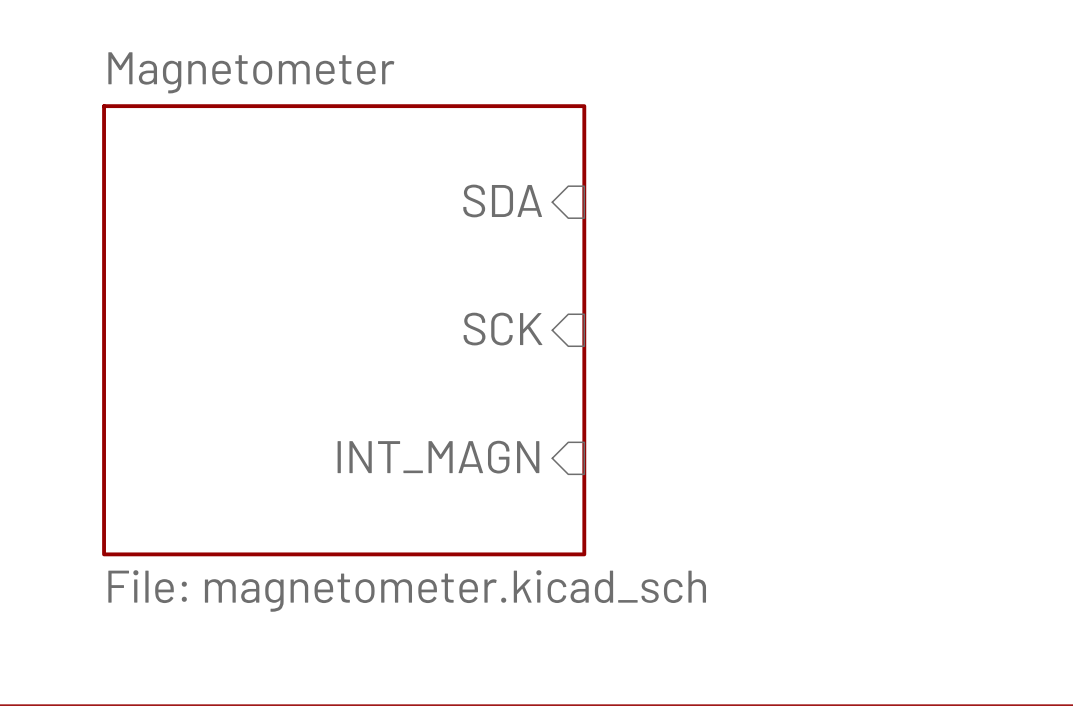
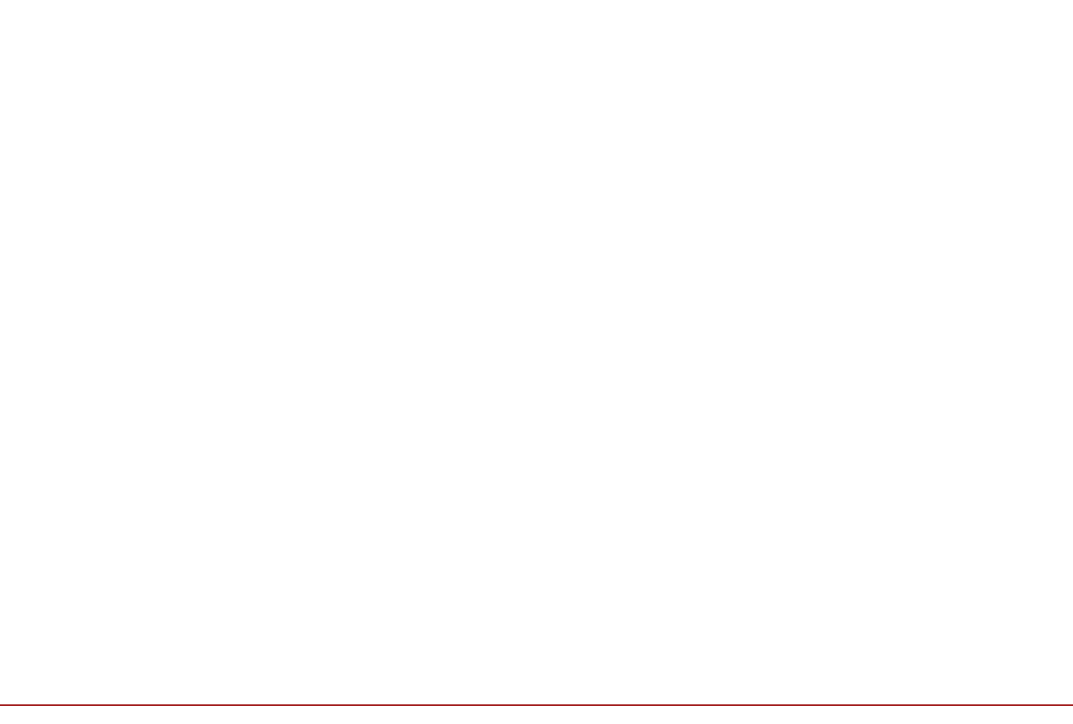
sheet pin: SDA (502, 200) -> none
sheet pin: SCK (503, 329) -> none
sheet Magnetometer: File: magnetometer.kicad_sch (344, 330) -> none
sheet pin: INT_MAGN (438, 457) -> none

